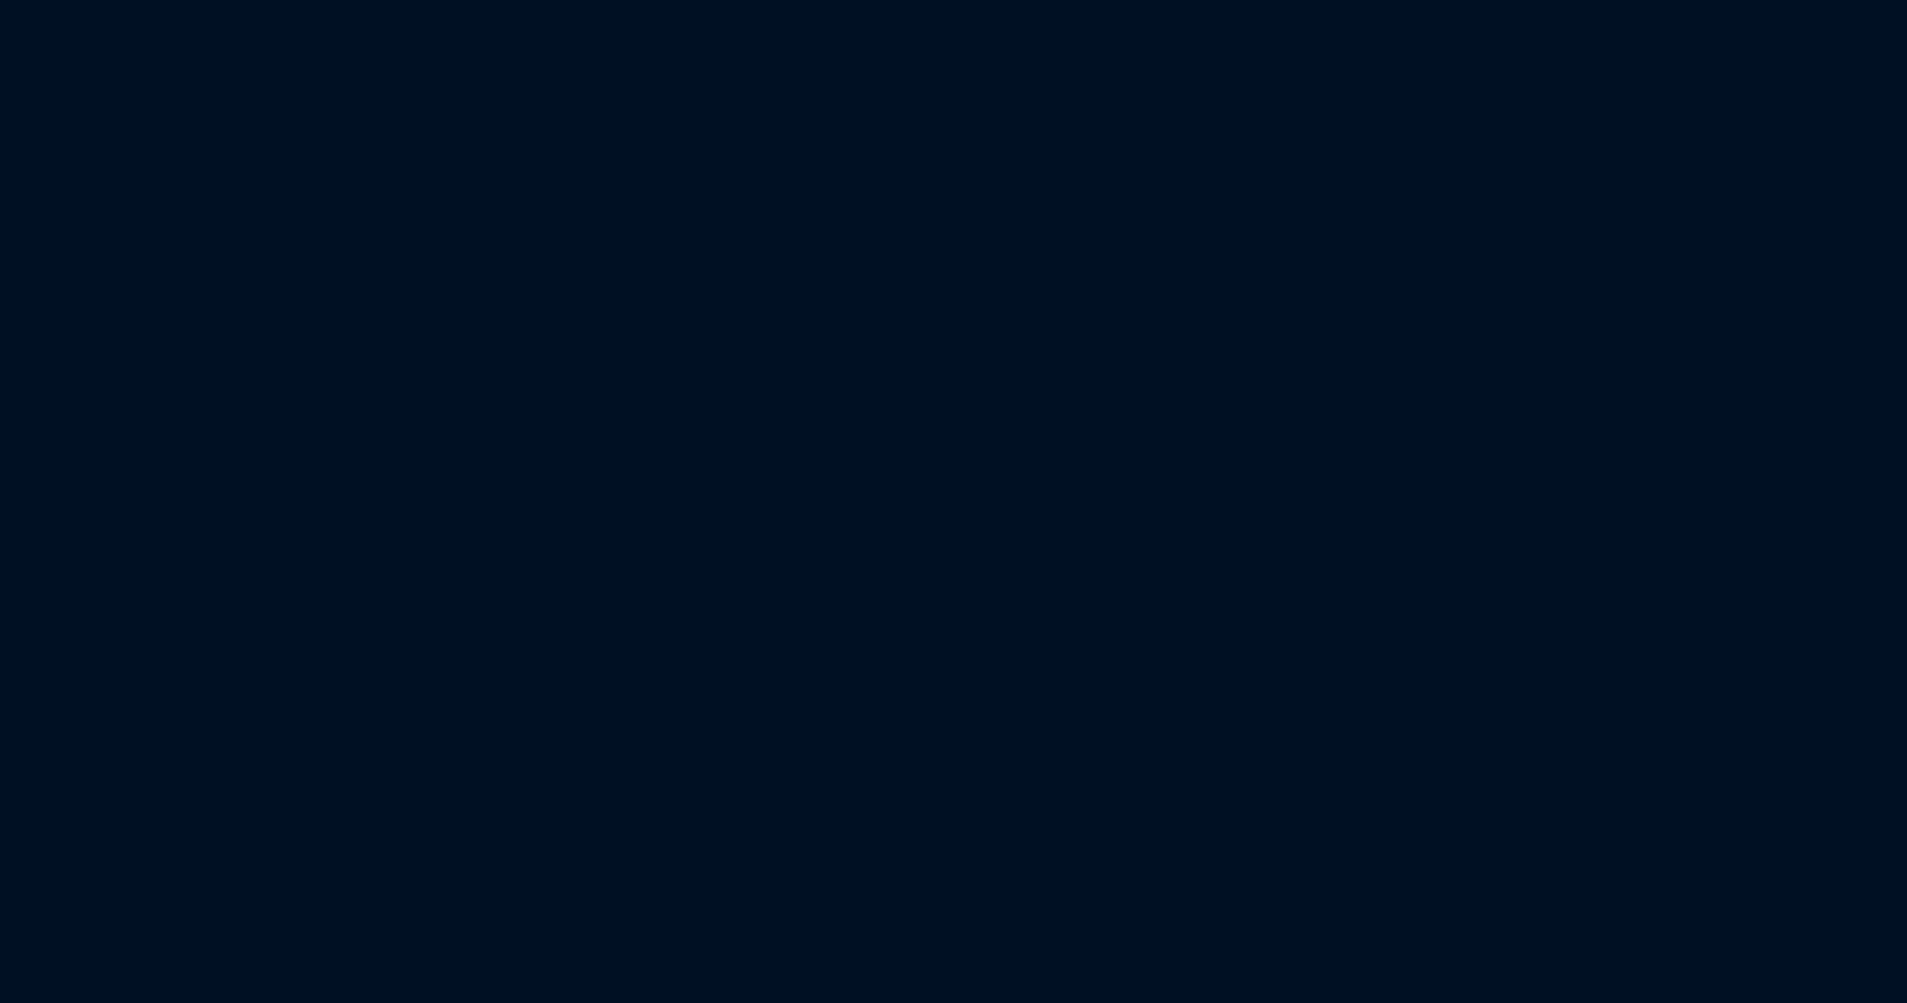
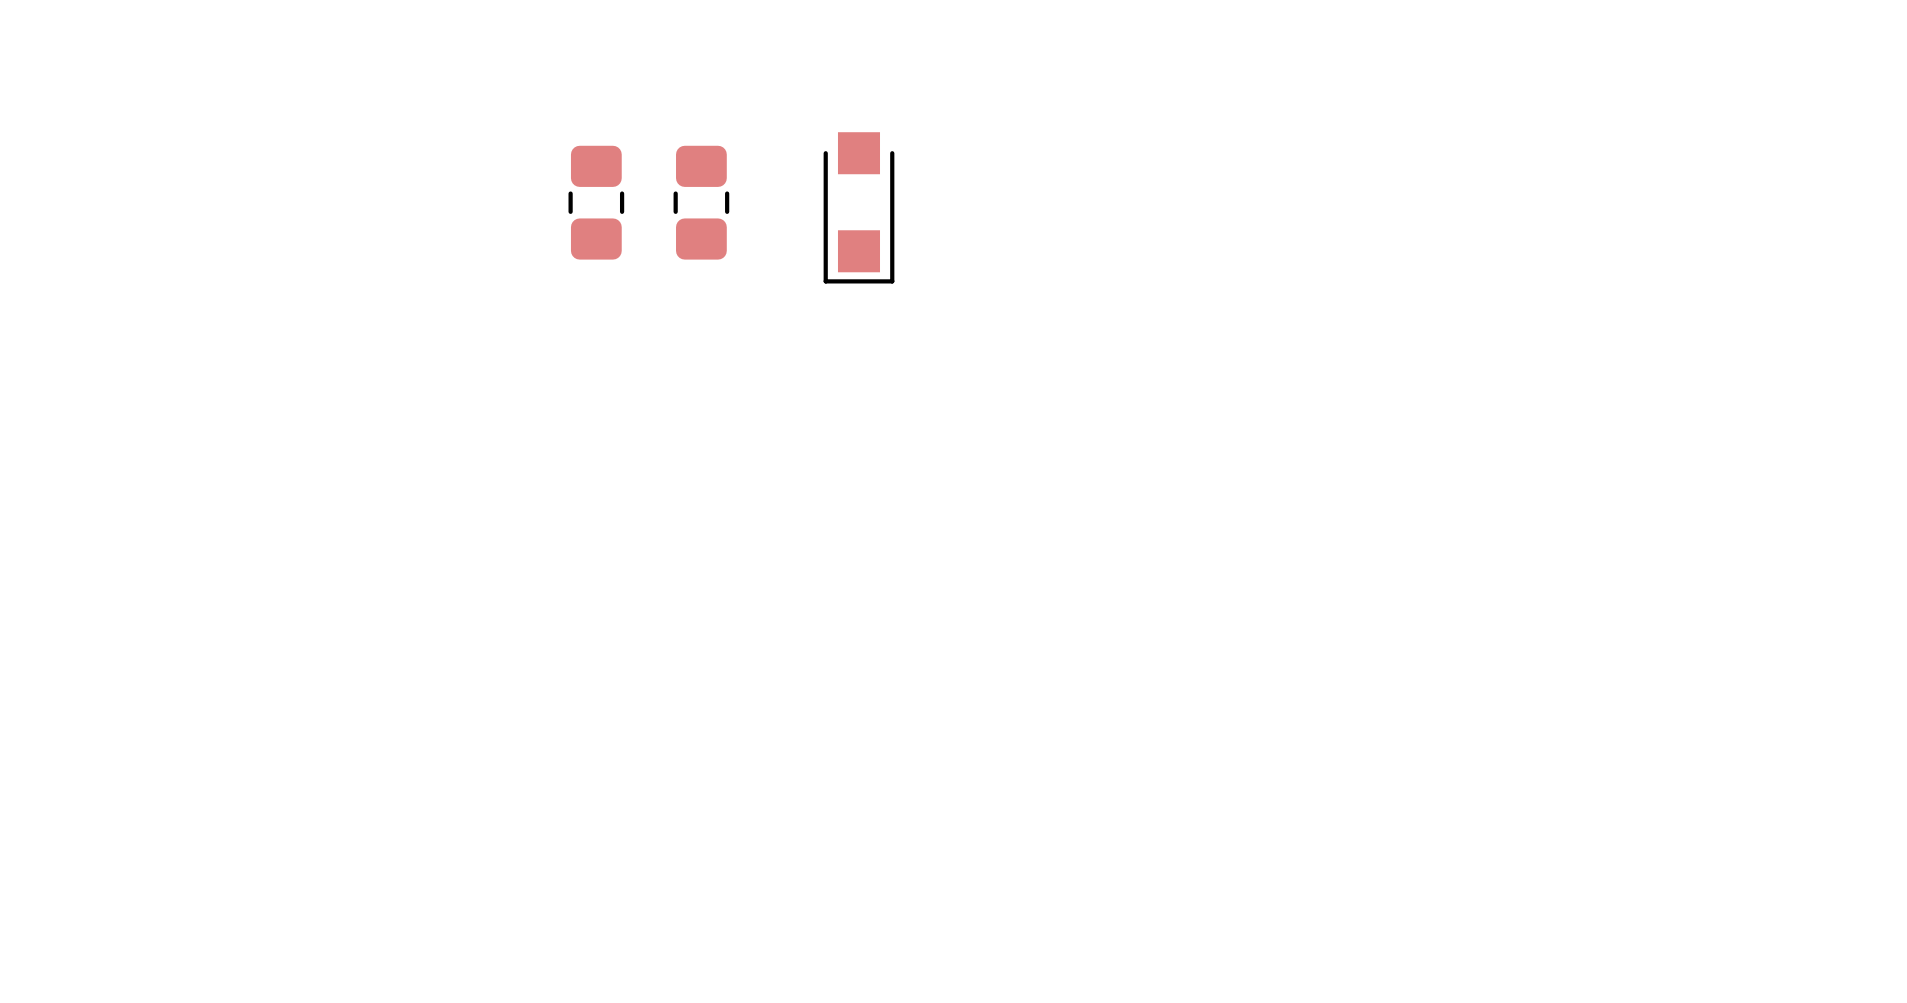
part: none -> (596, 202)
part: none -> (701, 202)
part: none -> (858, 207)

